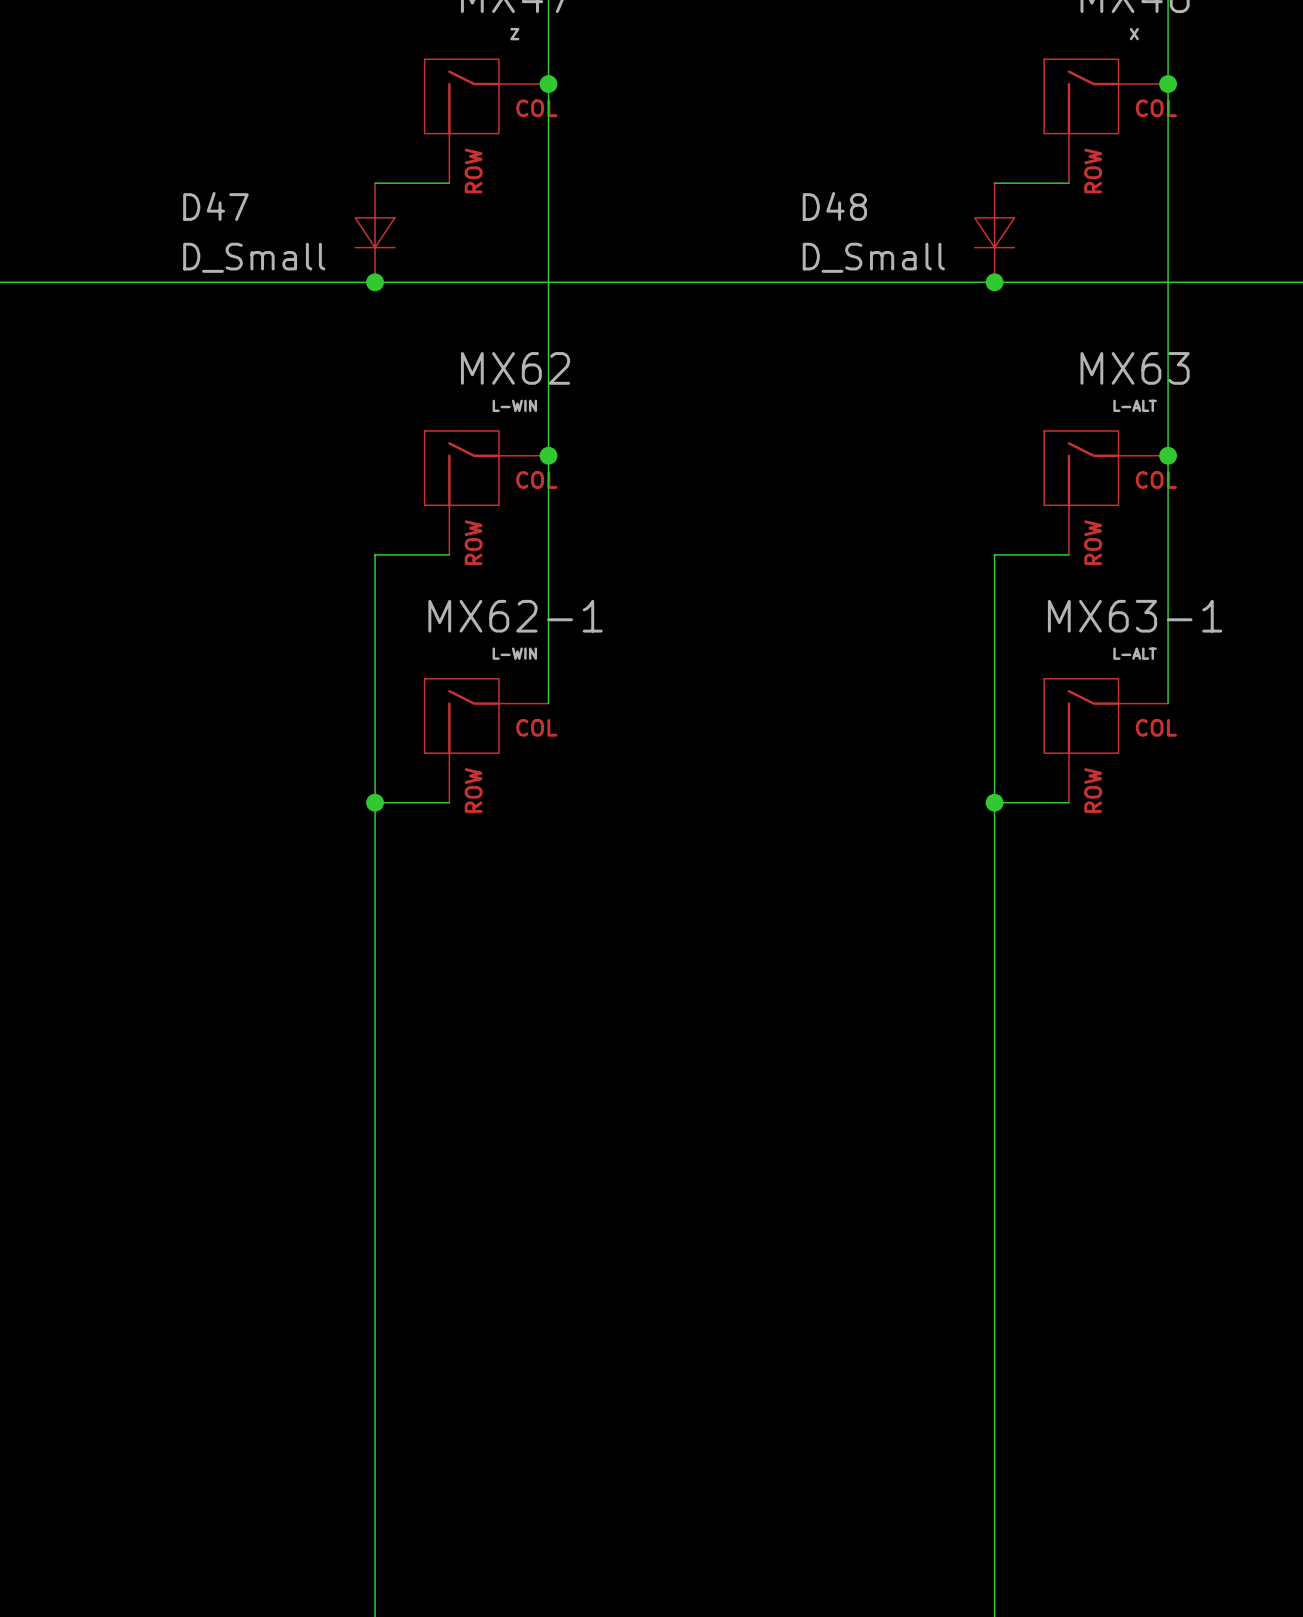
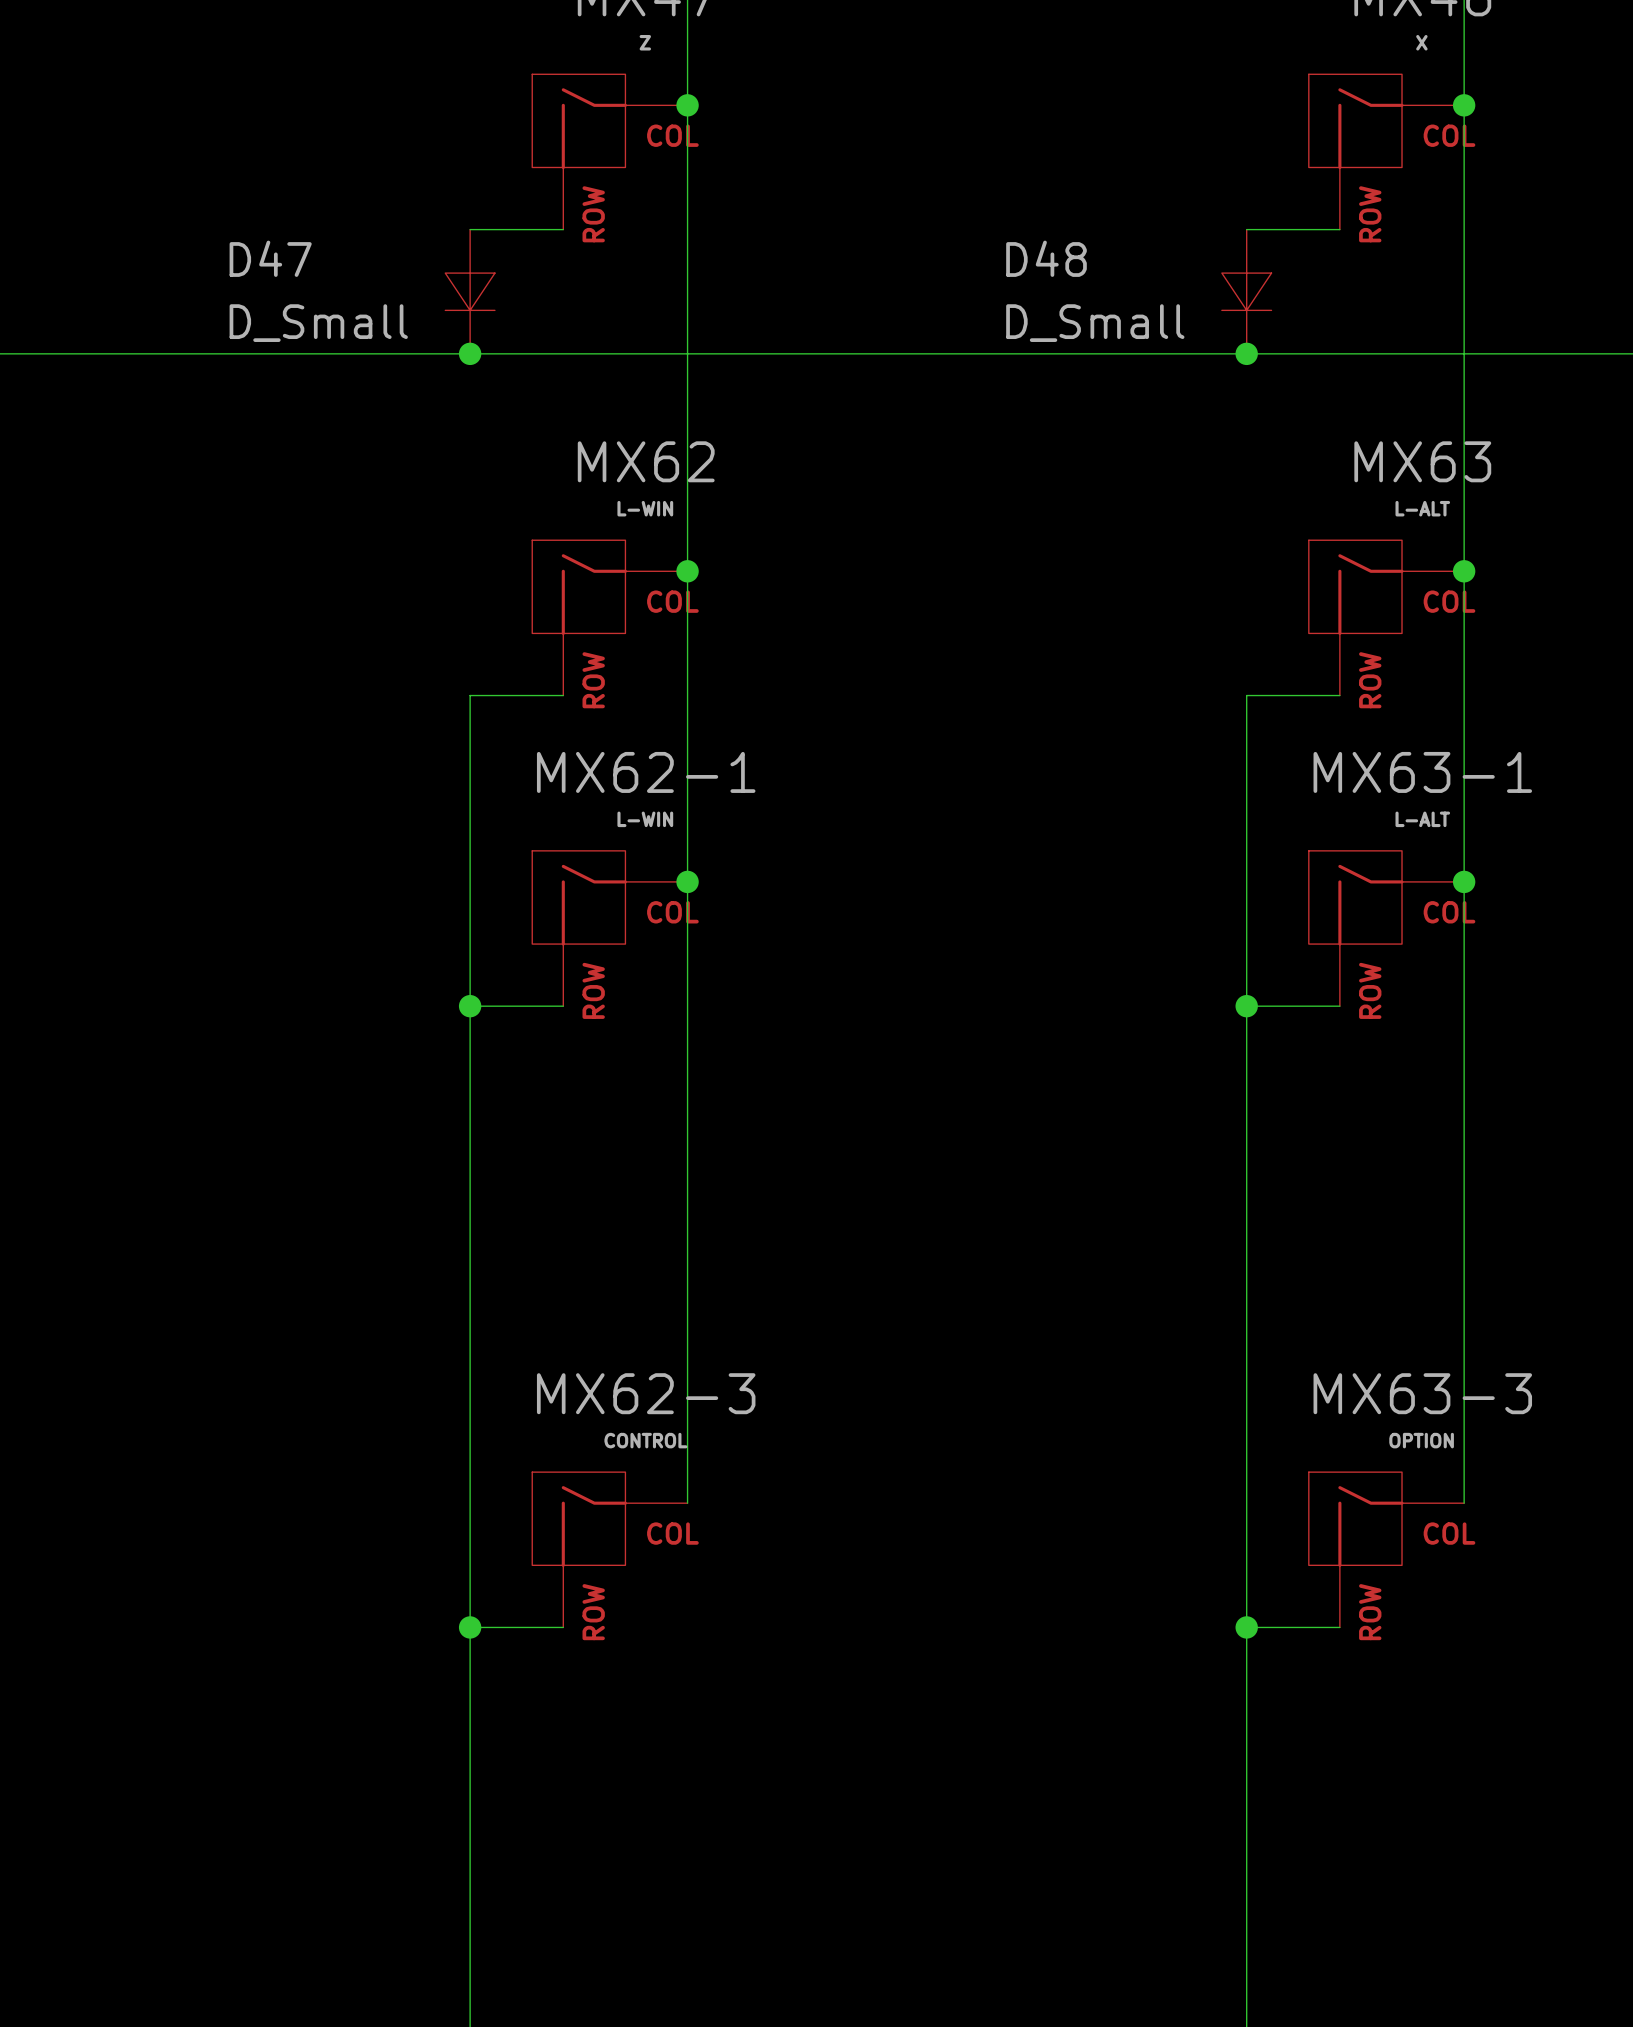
wire: none -> (687, 881) (687, 1503)
junction: none -> (687, 881)
wire: none -> (1464, 881) (1464, 1503)
junction: none -> (1464, 881)
MX62-3: none -> CONTROL (609, 1549)
MX63-3: none -> OPTION (1386, 1549)
wire: none -> (470, 1627) (563, 1627)
junction: none -> (470, 1627)
wire: none -> (1246, 1627) (1339, 1627)
junction: none -> (1246, 1627)

